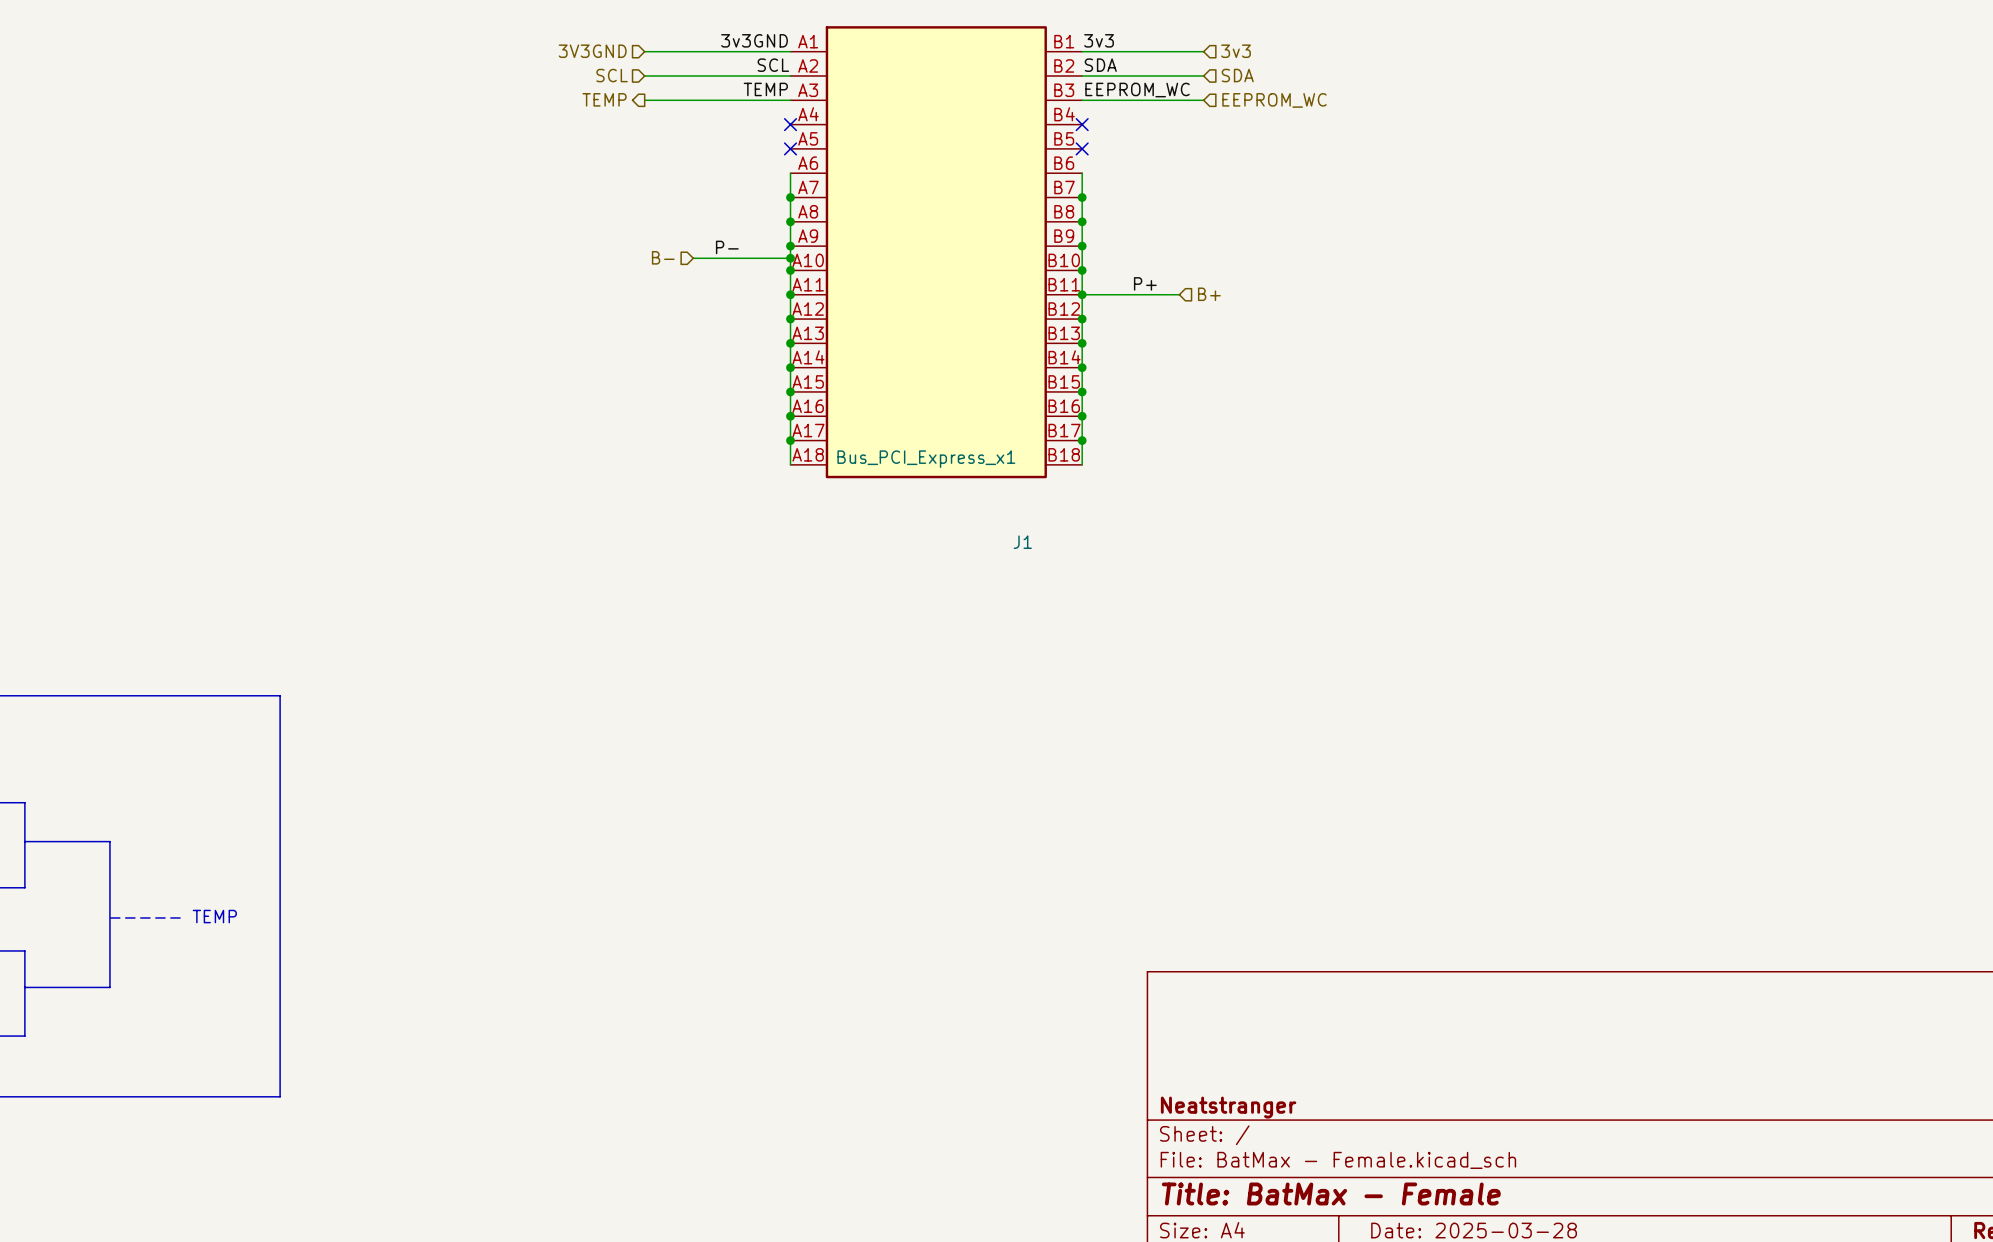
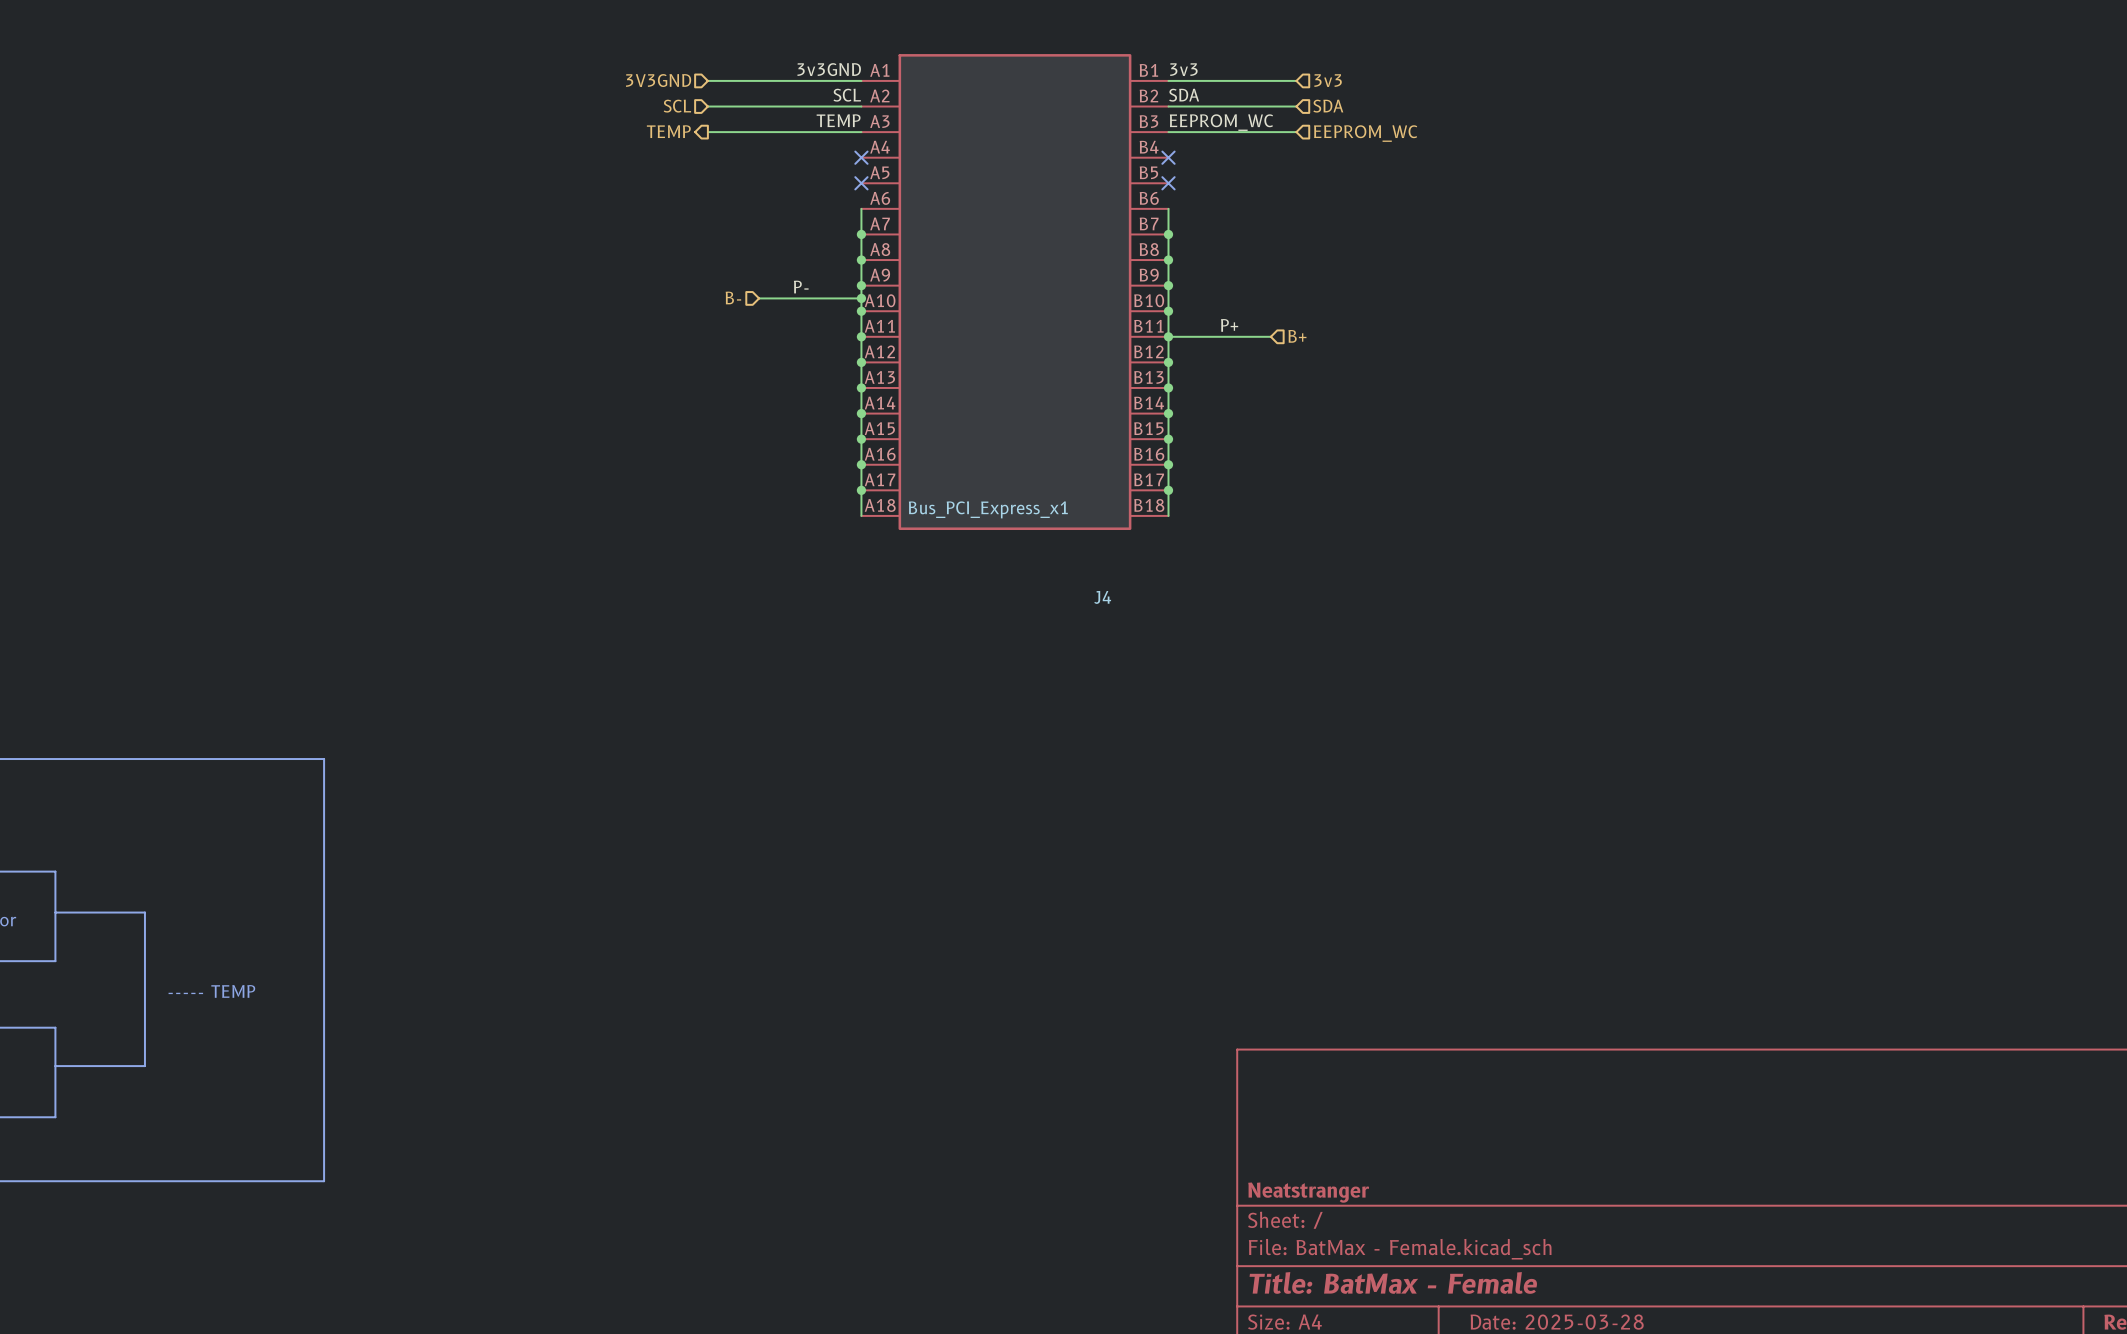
J1 name: J1 (1022, 542) -> J4 (1102, 597)

